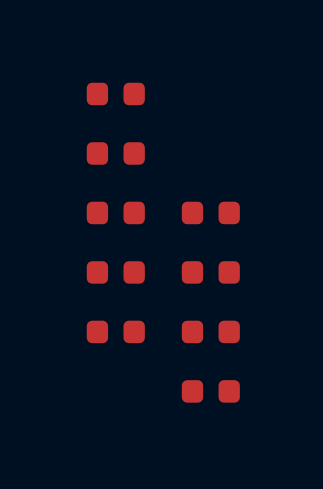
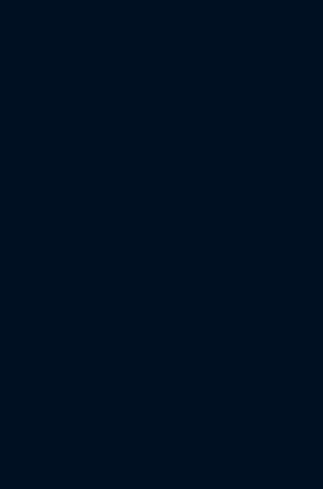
part: (115, 93) -> none
part: (115, 153) -> none
part: (115, 212) -> none
part: (210, 212) -> none
part: (115, 272) -> none
part: (210, 272) -> none
part: (115, 331) -> none
part: (210, 331) -> none
part: (210, 391) -> none

